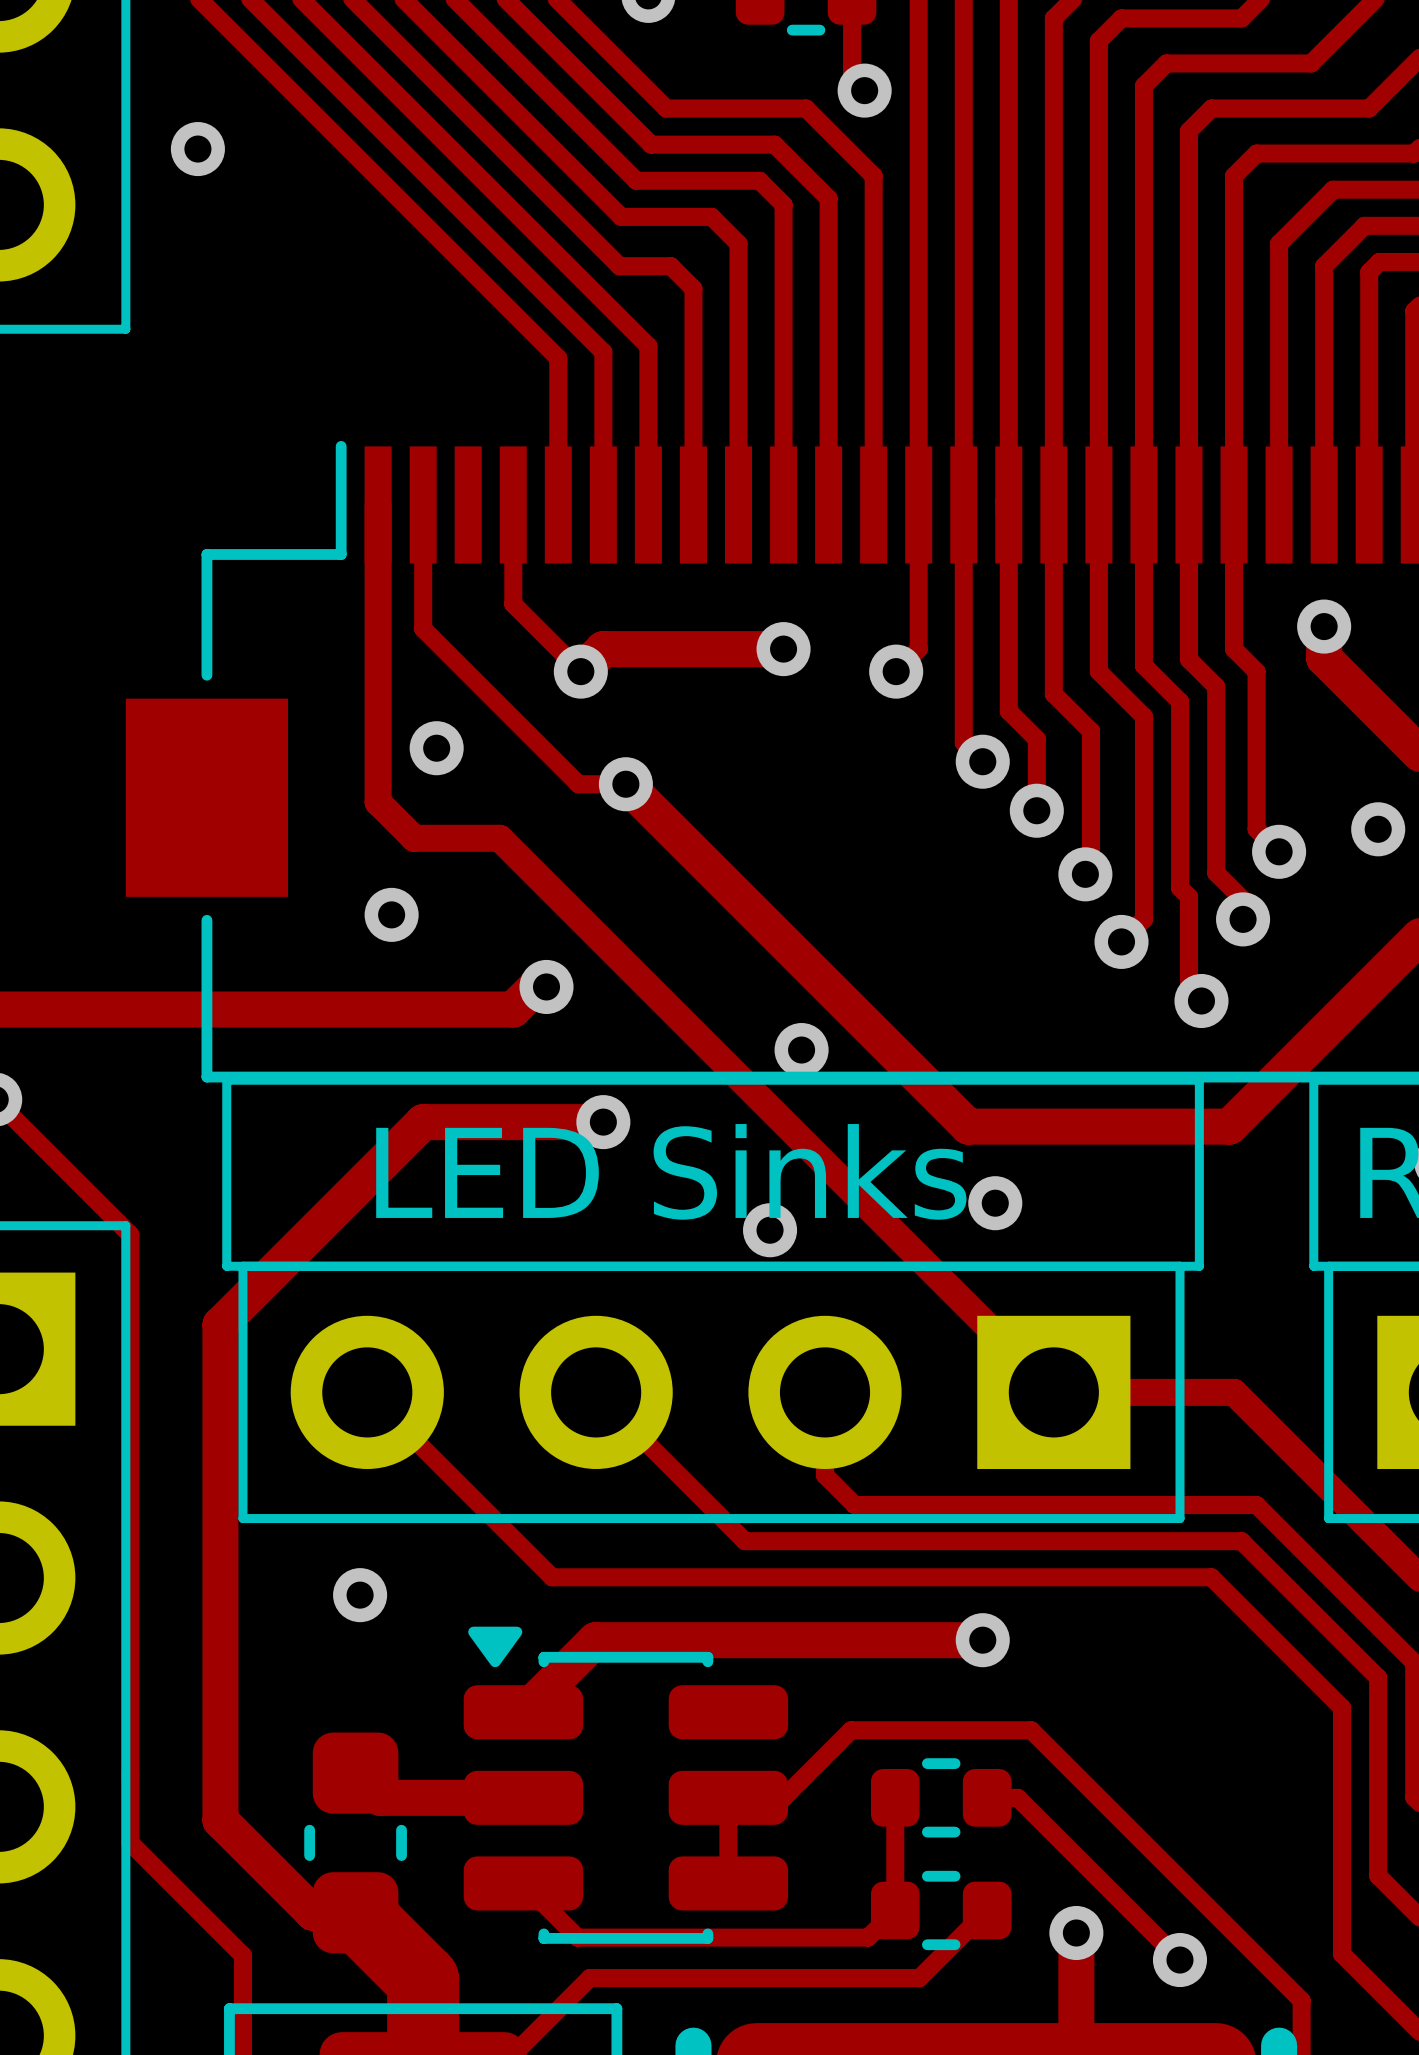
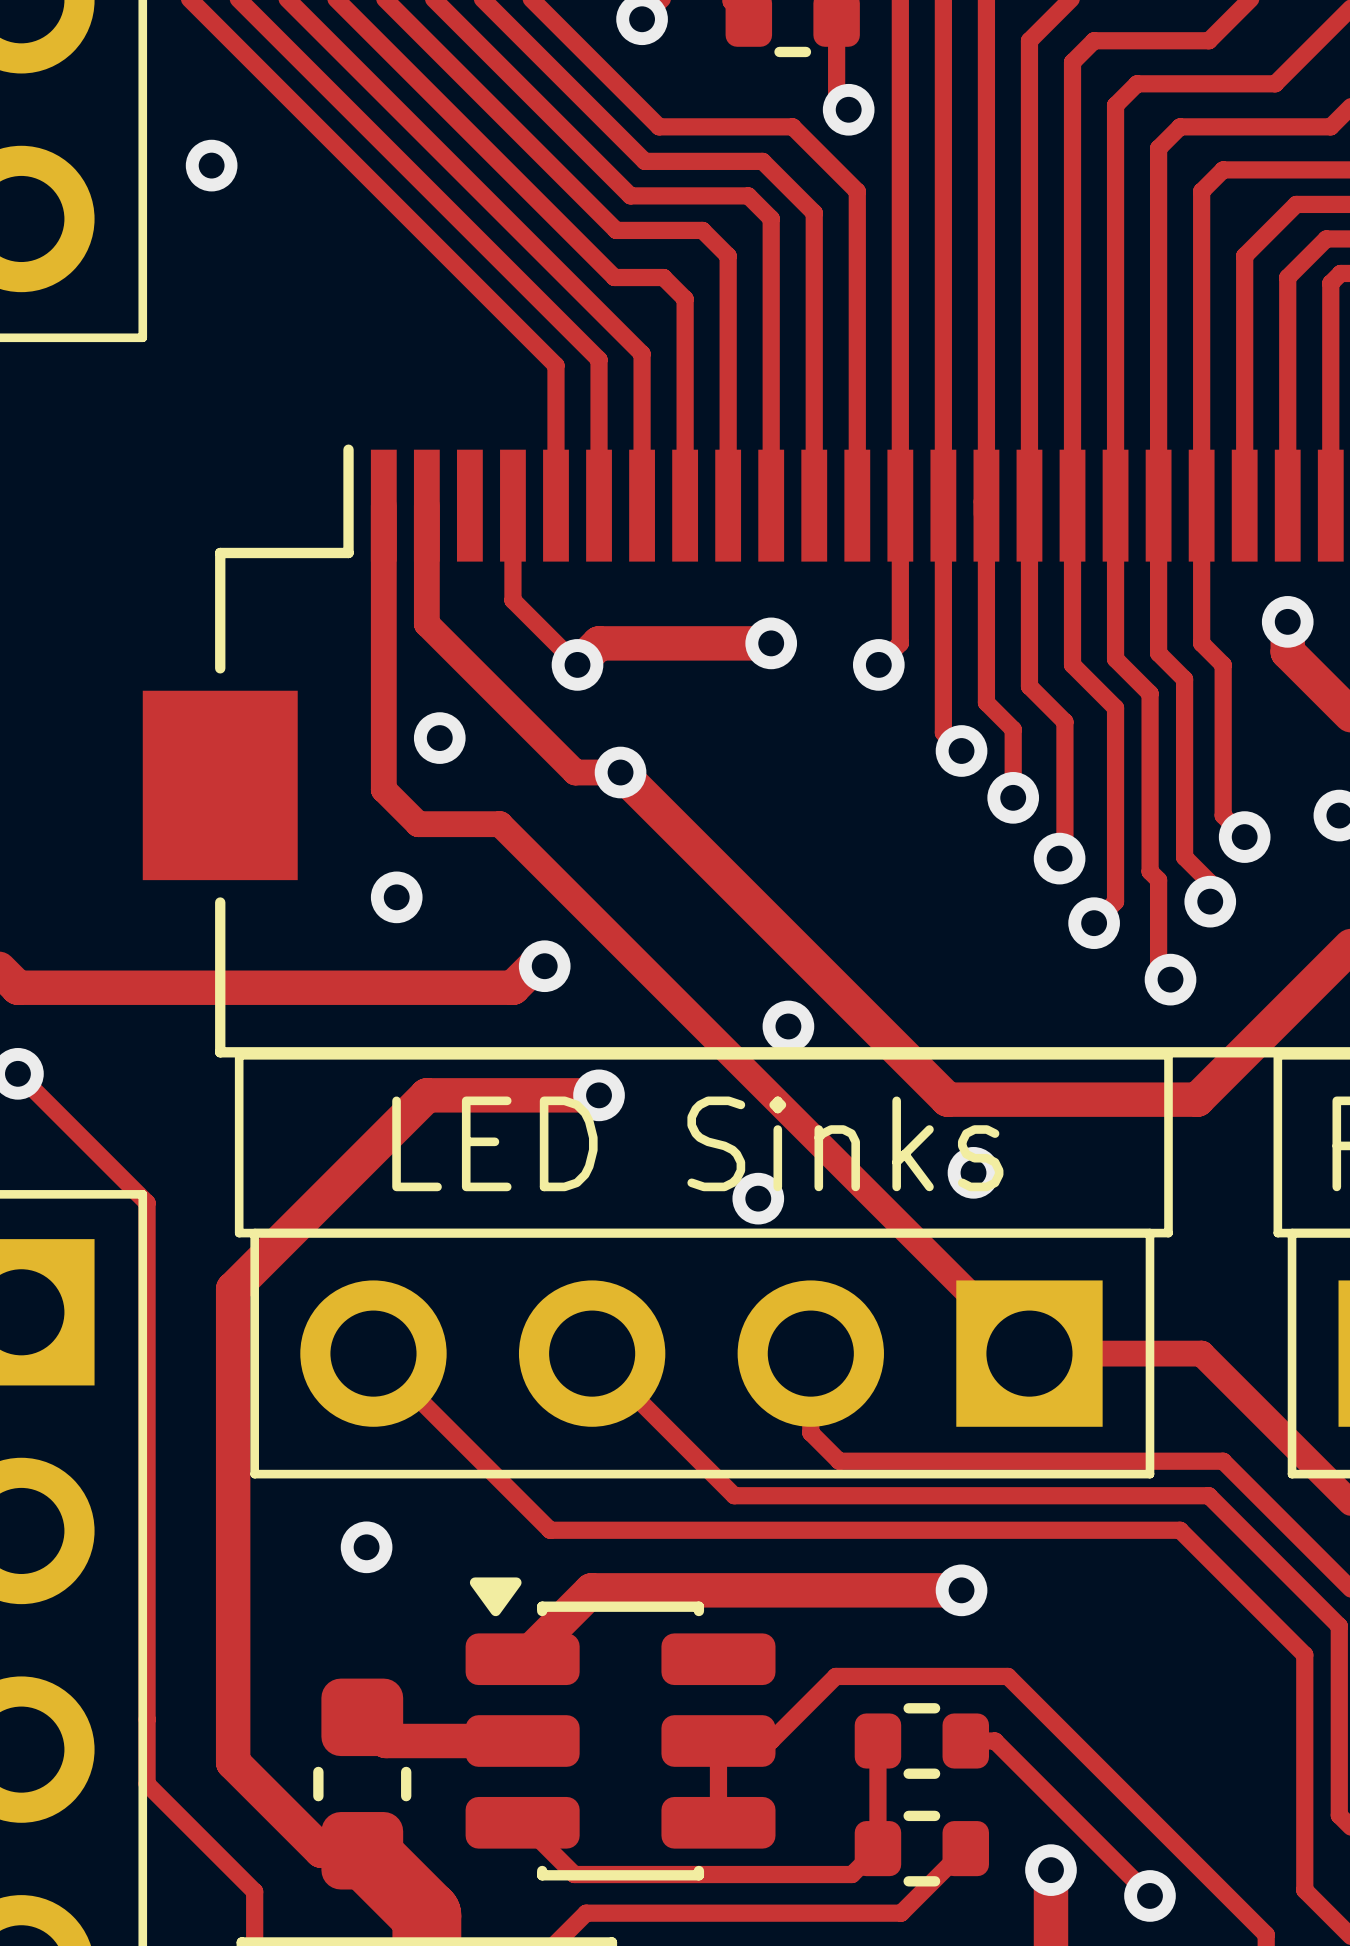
track width: thin (423, 504) (423, 628) (578, 784) (625, 784) -> thick (426, 505) (426, 623) (575, 772) (620, 772)

